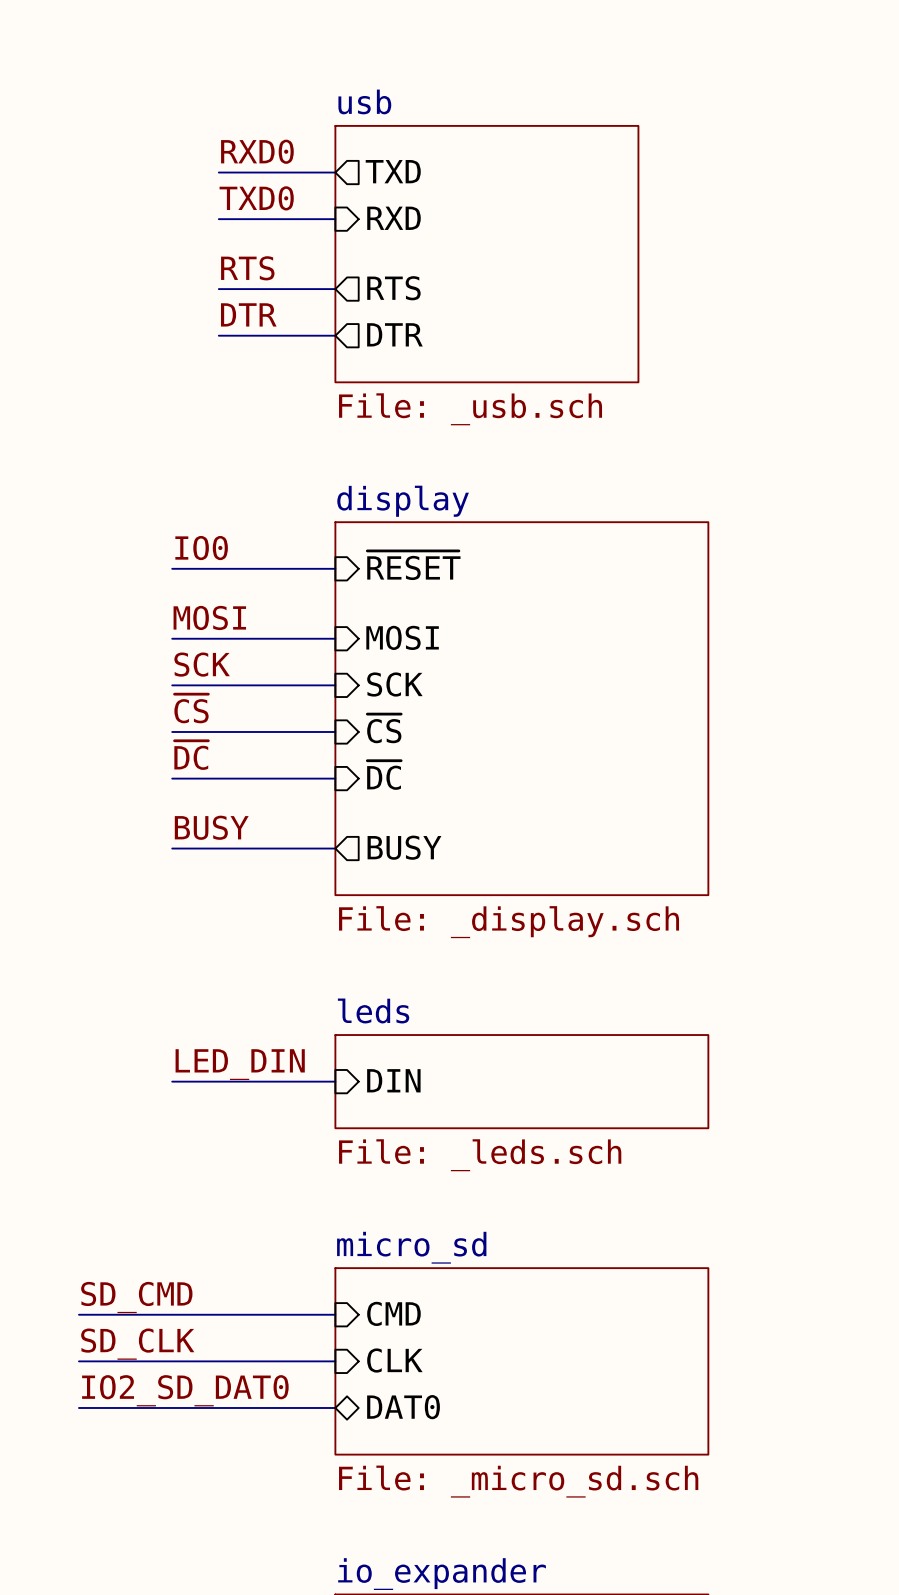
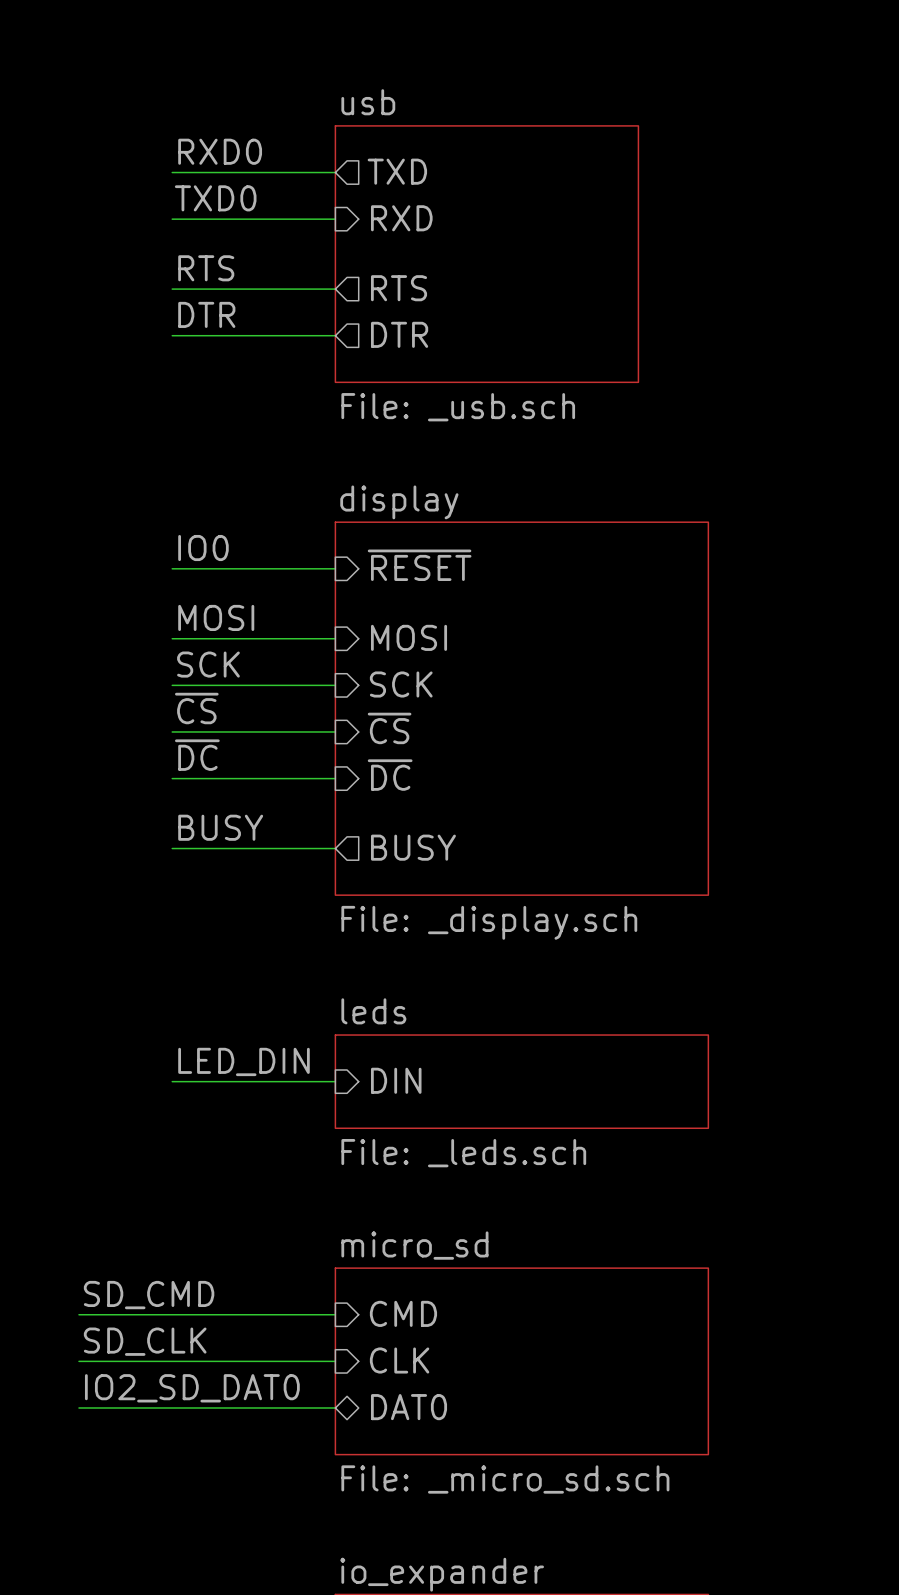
label position: RXD0 (257, 151) -> RXD0 (220, 151)
wire: none -> (172, 172) (218, 172)
label position: TXD0 (256, 198) -> TXD0 (215, 198)
wire: none -> (172, 219) (218, 219)
label position: RTS (247, 268) -> RTS (206, 268)
wire: none -> (172, 289) (218, 289)
label position: DTR (248, 314) -> DTR (206, 314)
wire: none -> (172, 335) (218, 335)

